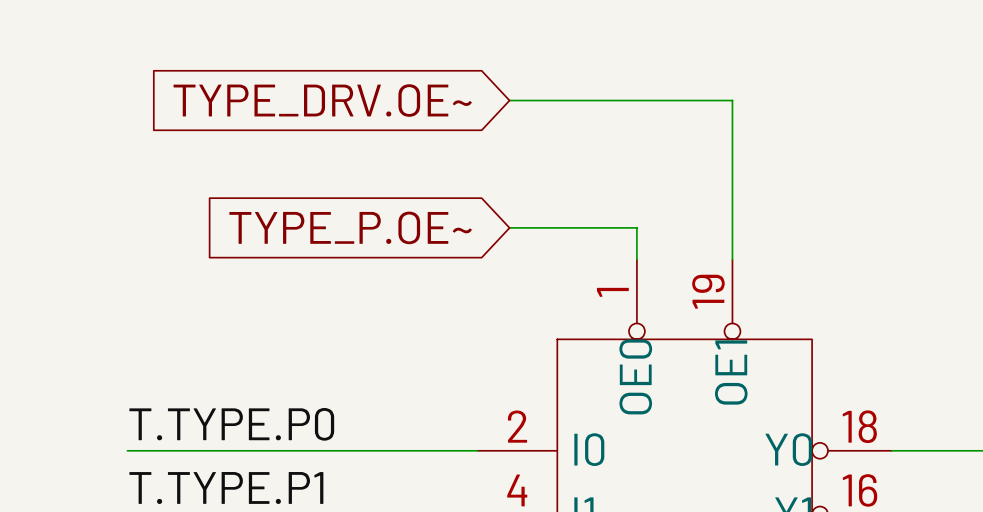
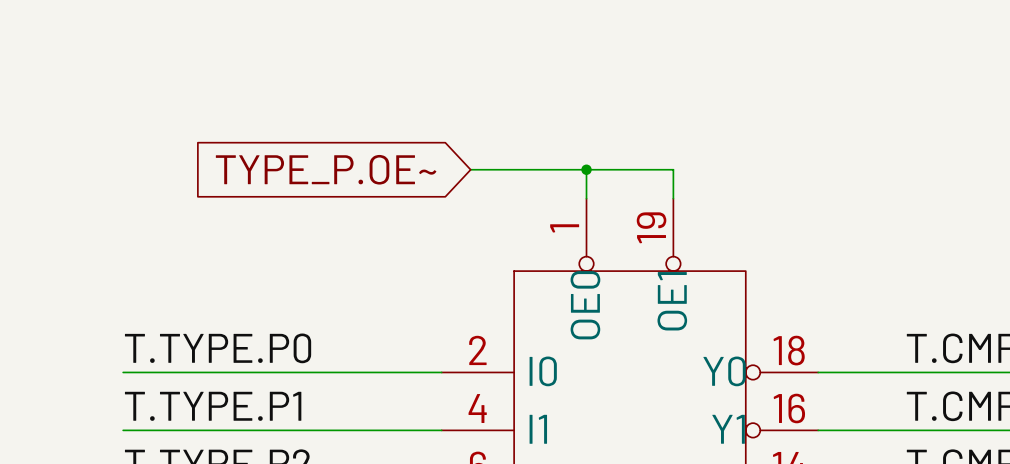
global label: TYPE_DRV.OE~ (322, 100) -> none
wire: (509, 100) (732, 100) (732, 227) -> (586, 169) (673, 169)
junction: none -> (586, 169)

